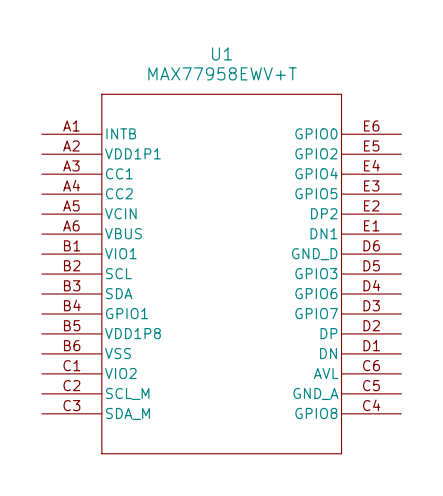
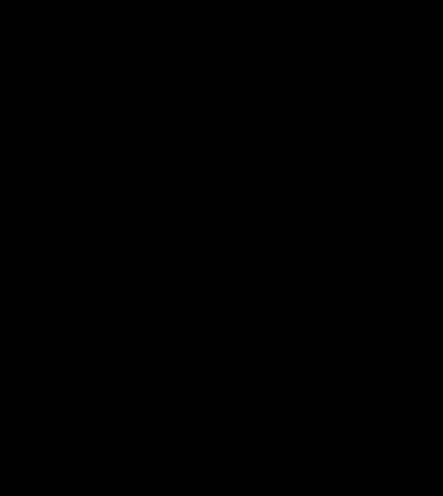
U1: MAX77958EWV+T (221, 274) -> none

